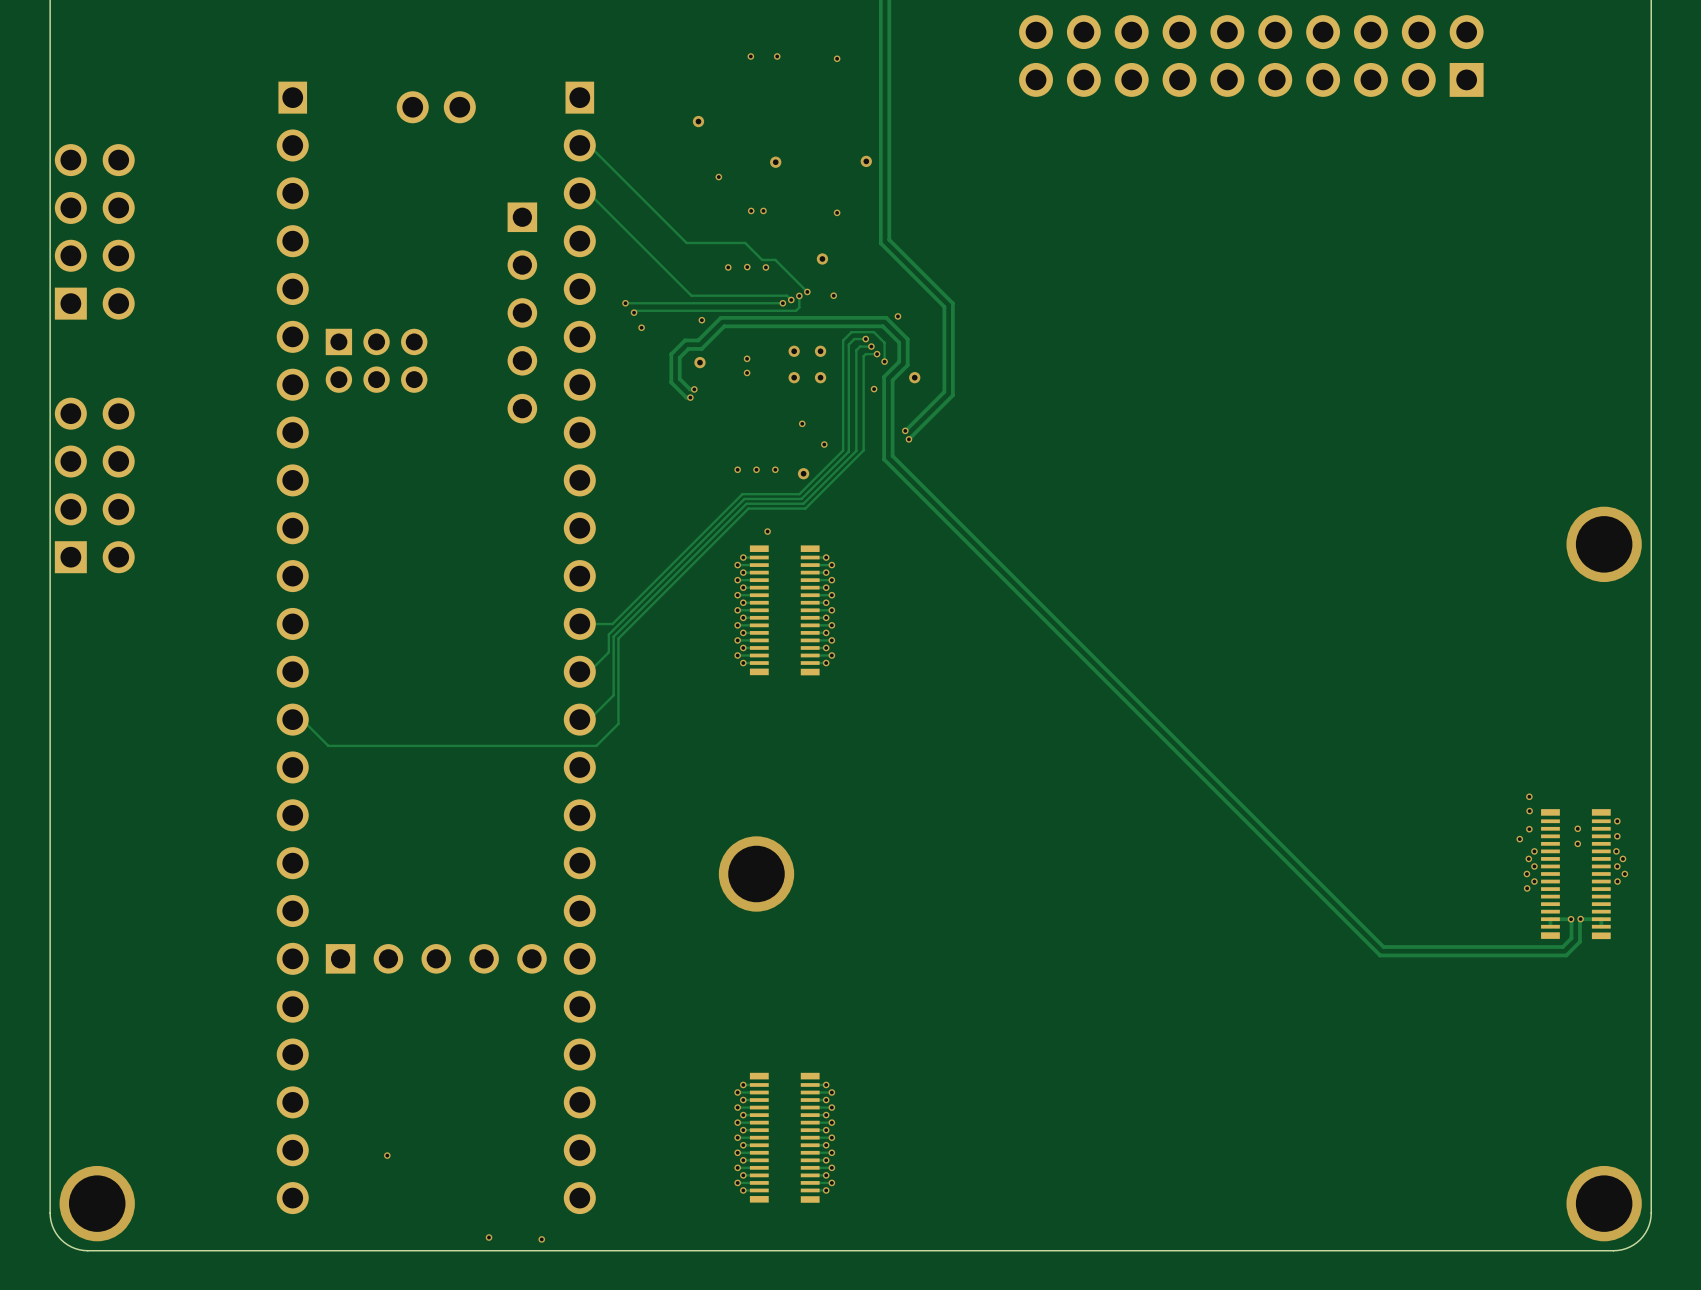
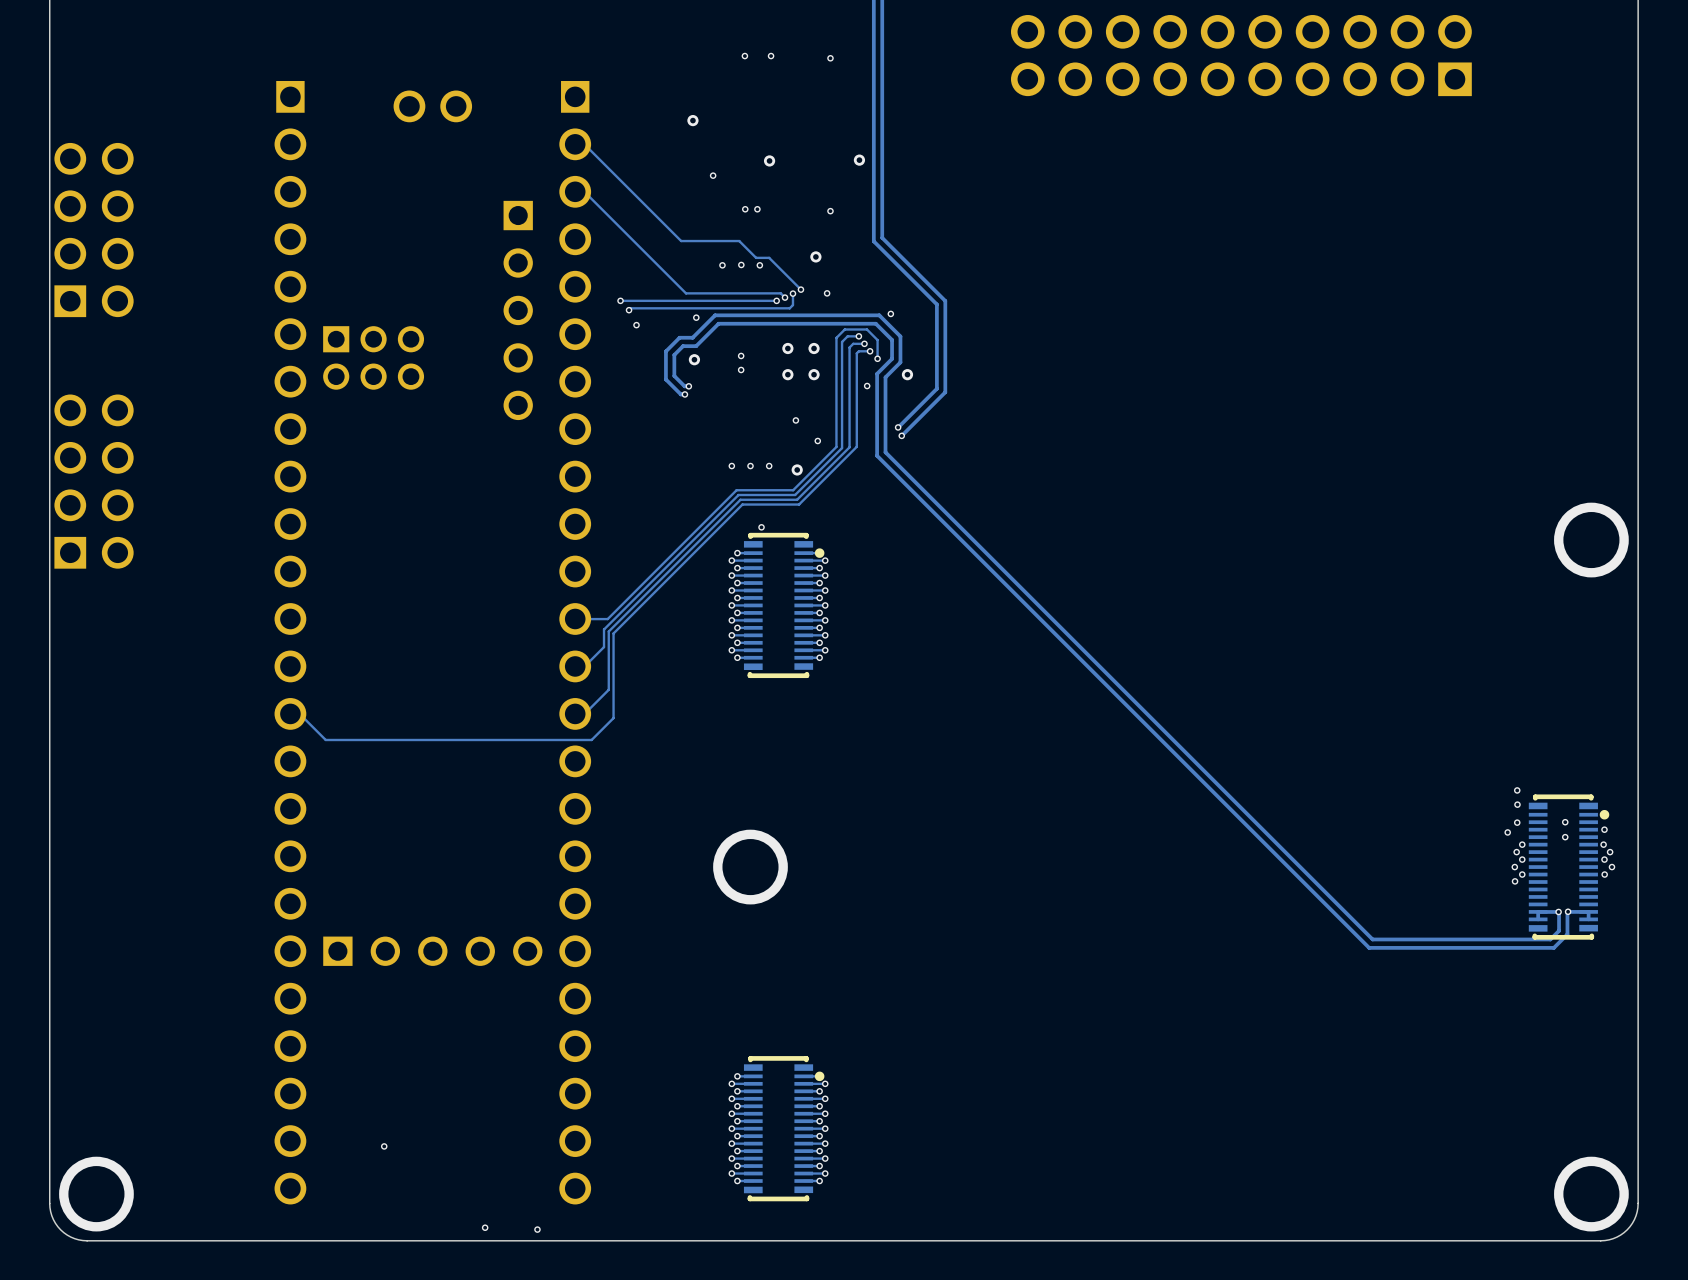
part footprint: [749, 545, 820, 676] -> [743, 532, 825, 679]
part footprint: [1541, 809, 1611, 940] -> [1528, 794, 1610, 940]
part footprint: [749, 1072, 820, 1203] -> [743, 1056, 825, 1202]

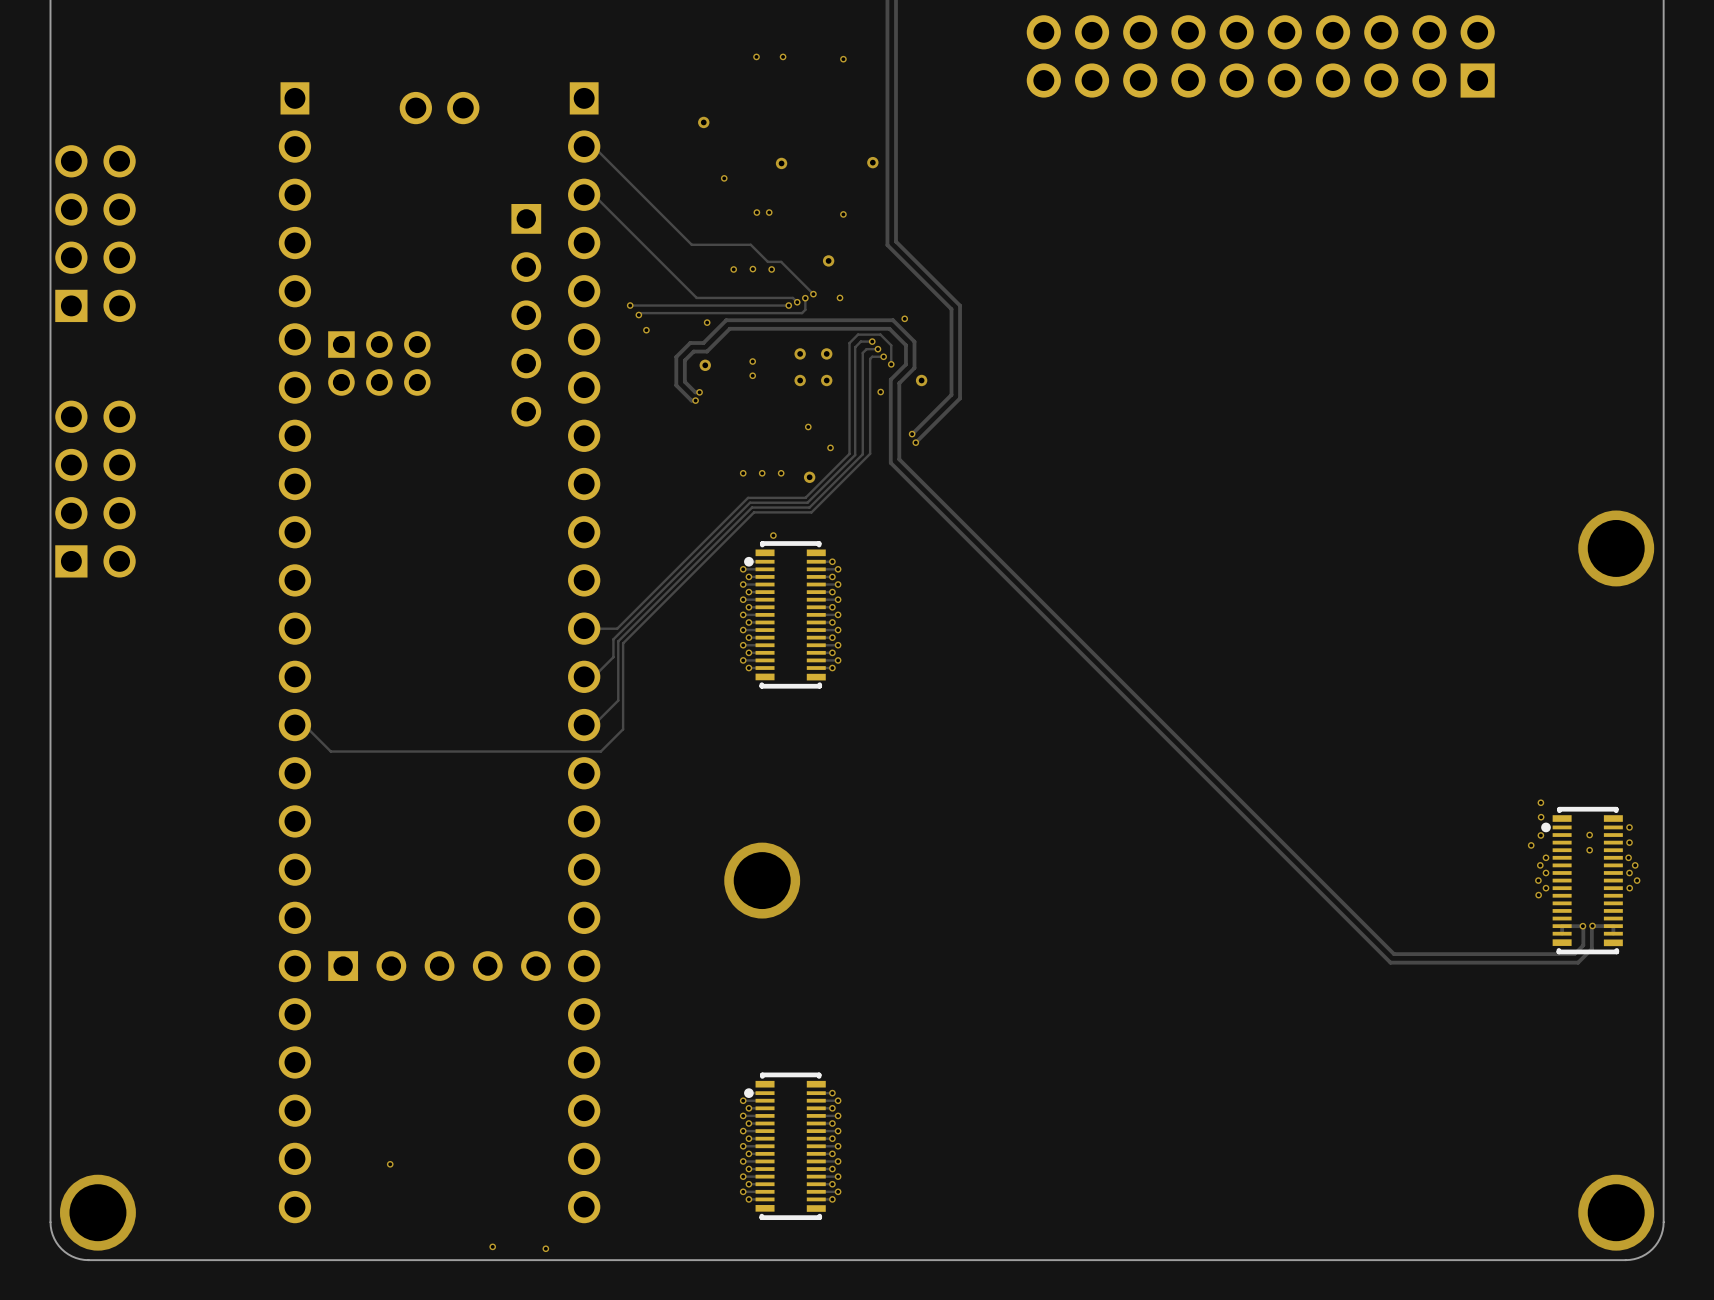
part footprint: [743, 532, 825, 679] -> [744, 541, 826, 689]
part footprint: [1528, 794, 1610, 940] -> [1541, 806, 1623, 955]
part footprint: [743, 1056, 825, 1202] -> [744, 1072, 826, 1221]

